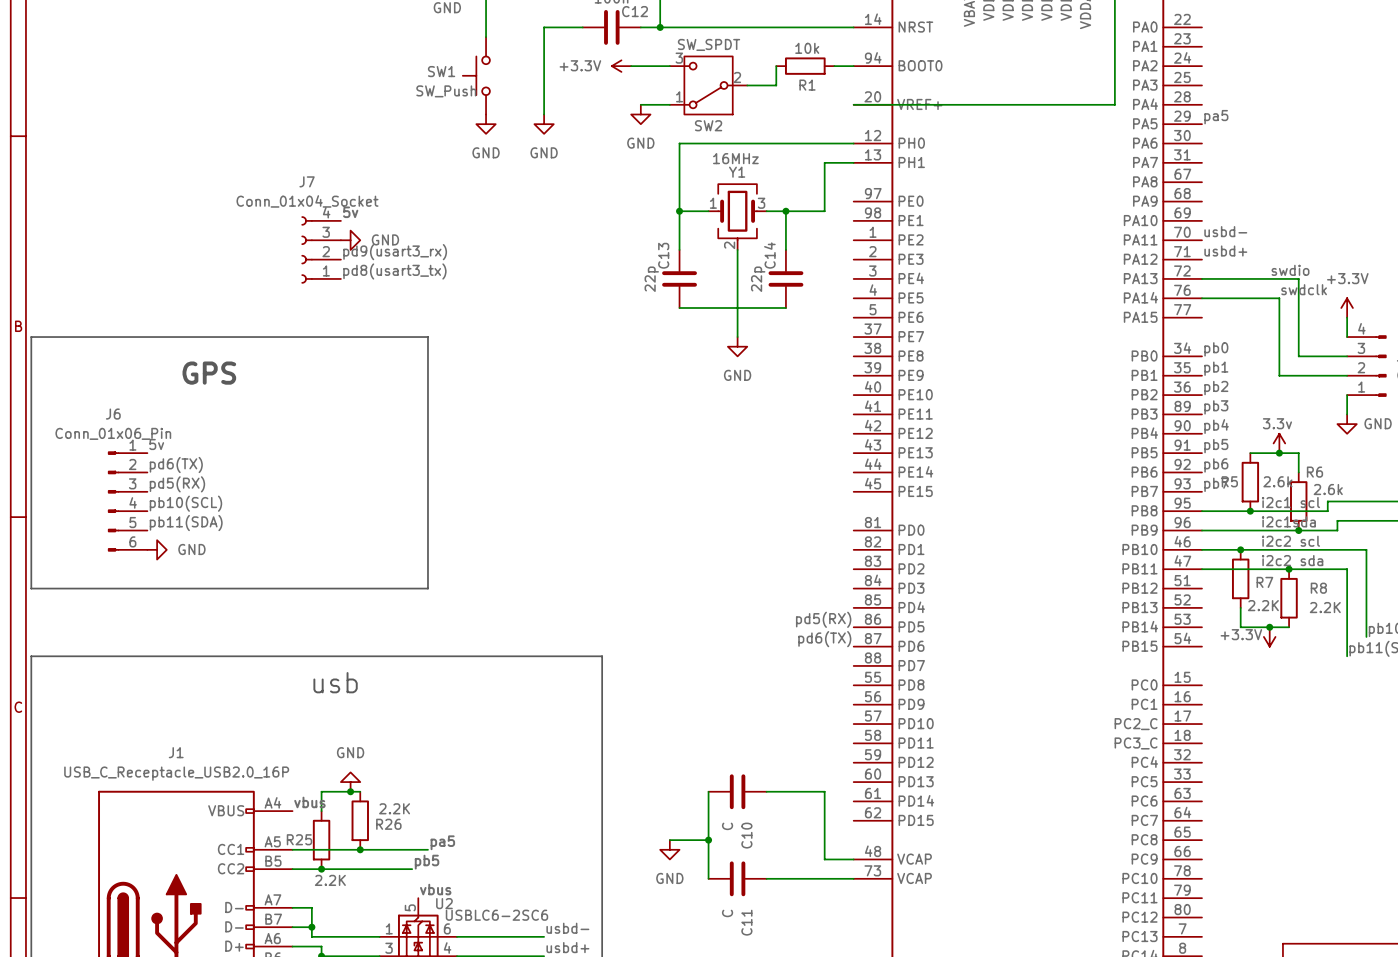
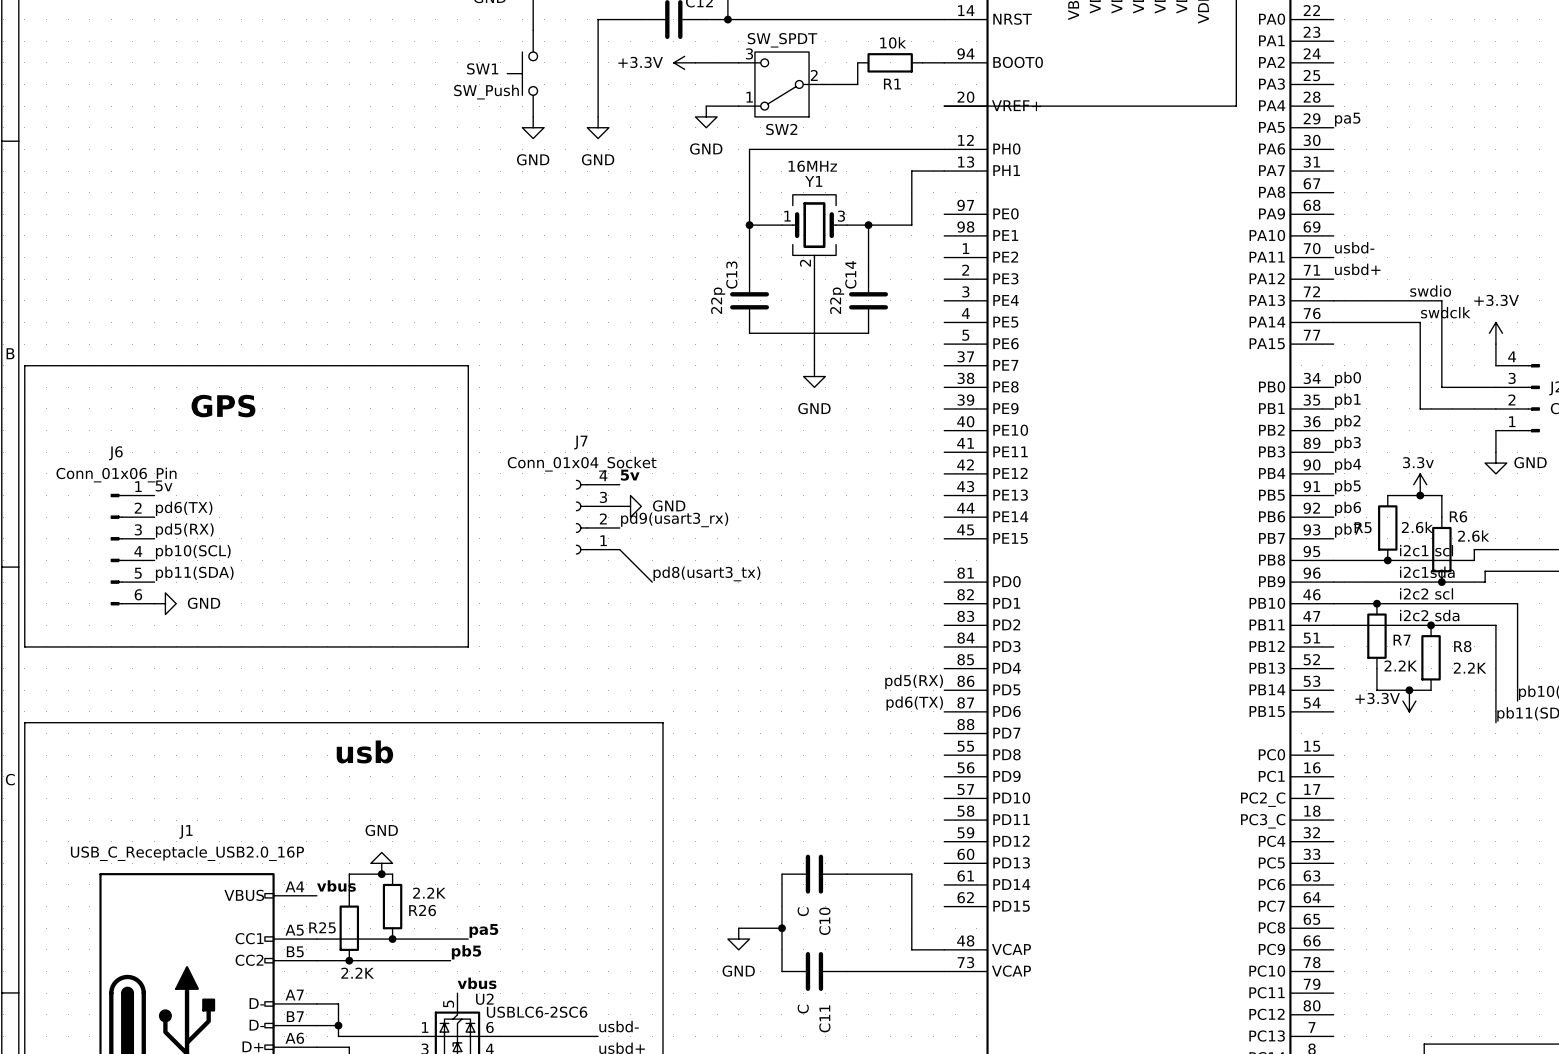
label: 5v (350, 212) -> none
power symbol: GND (350, 240) -> none
J7 position: (321, 249) -> (597, 517)
label: pd9(usart3_rx) (395, 252) -> none
label: pd8(usart3_tx) (394, 271) -> none
label: none -> 5v (630, 475)
power symbol: none -> GND (630, 506)
label: none -> pd9(usart3_rx) (674, 519)
wire: none -> (619, 549) (652, 582)
label: none -> pd8(usart3_tx) (706, 573)

